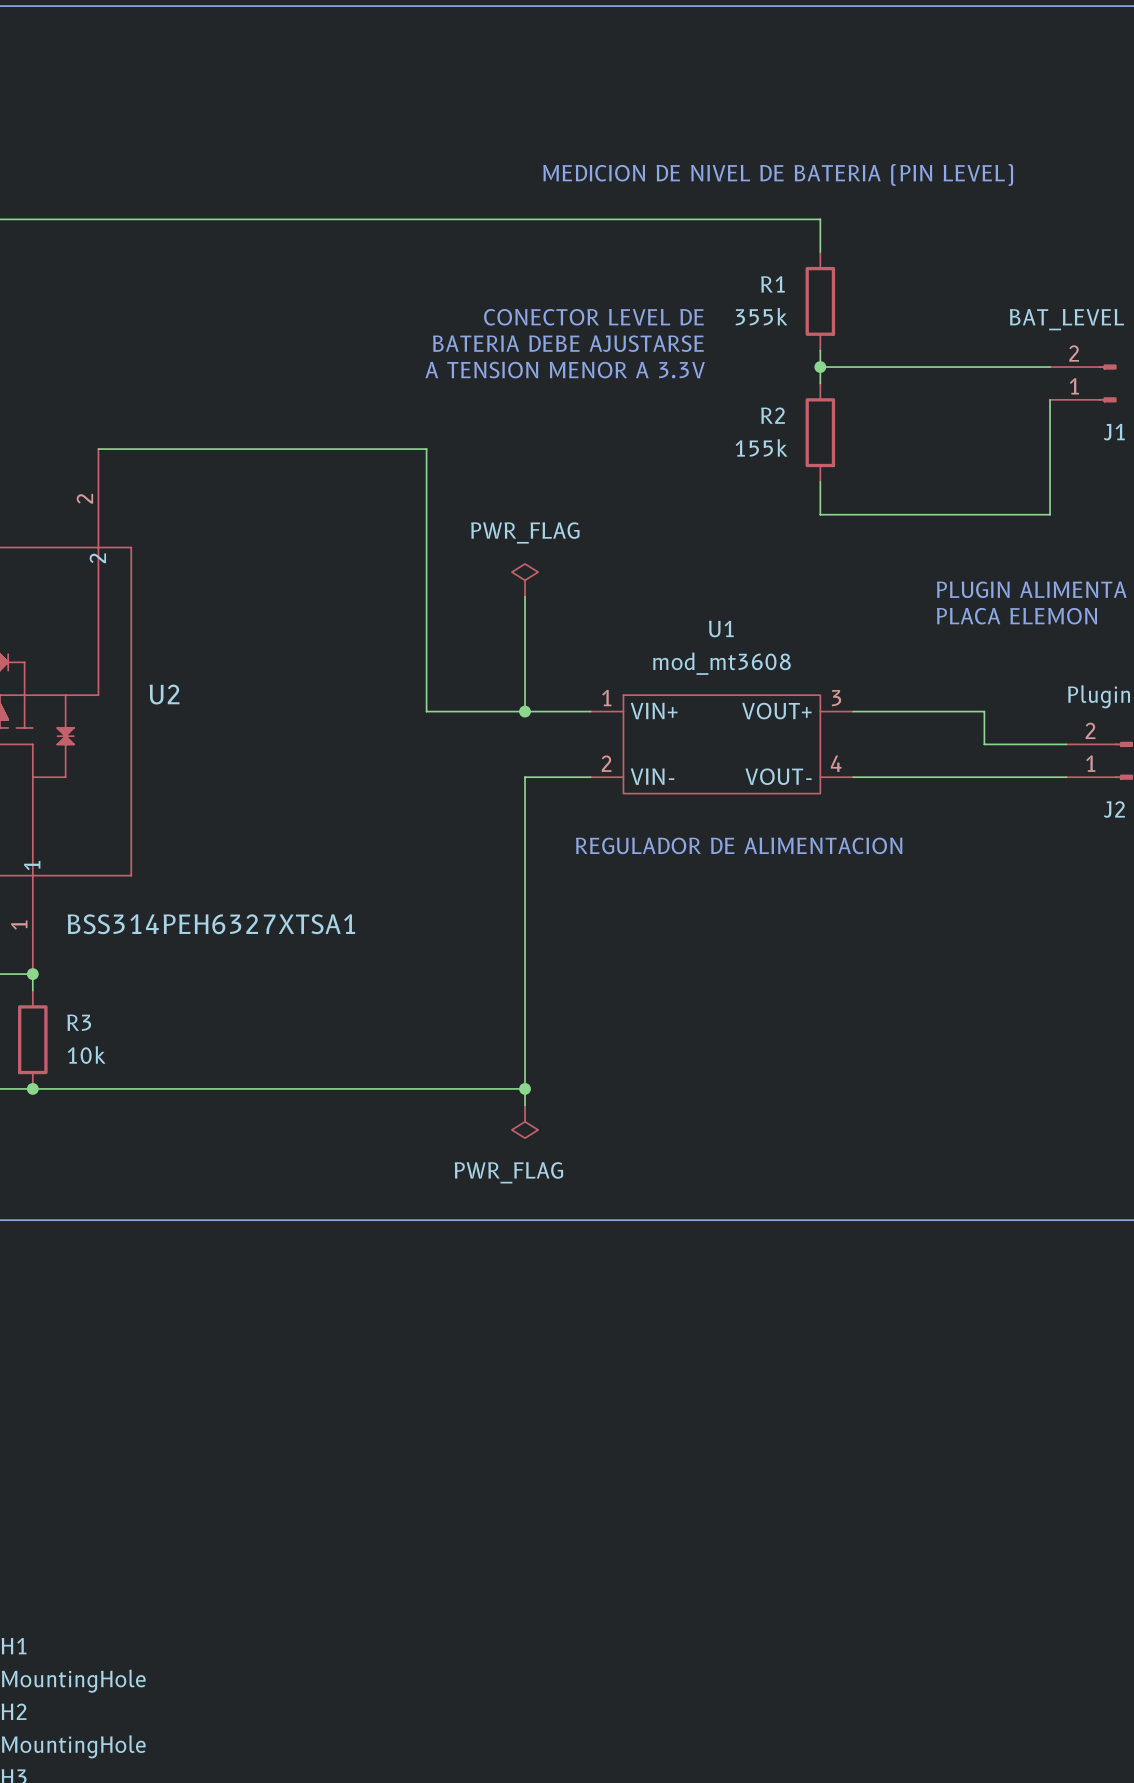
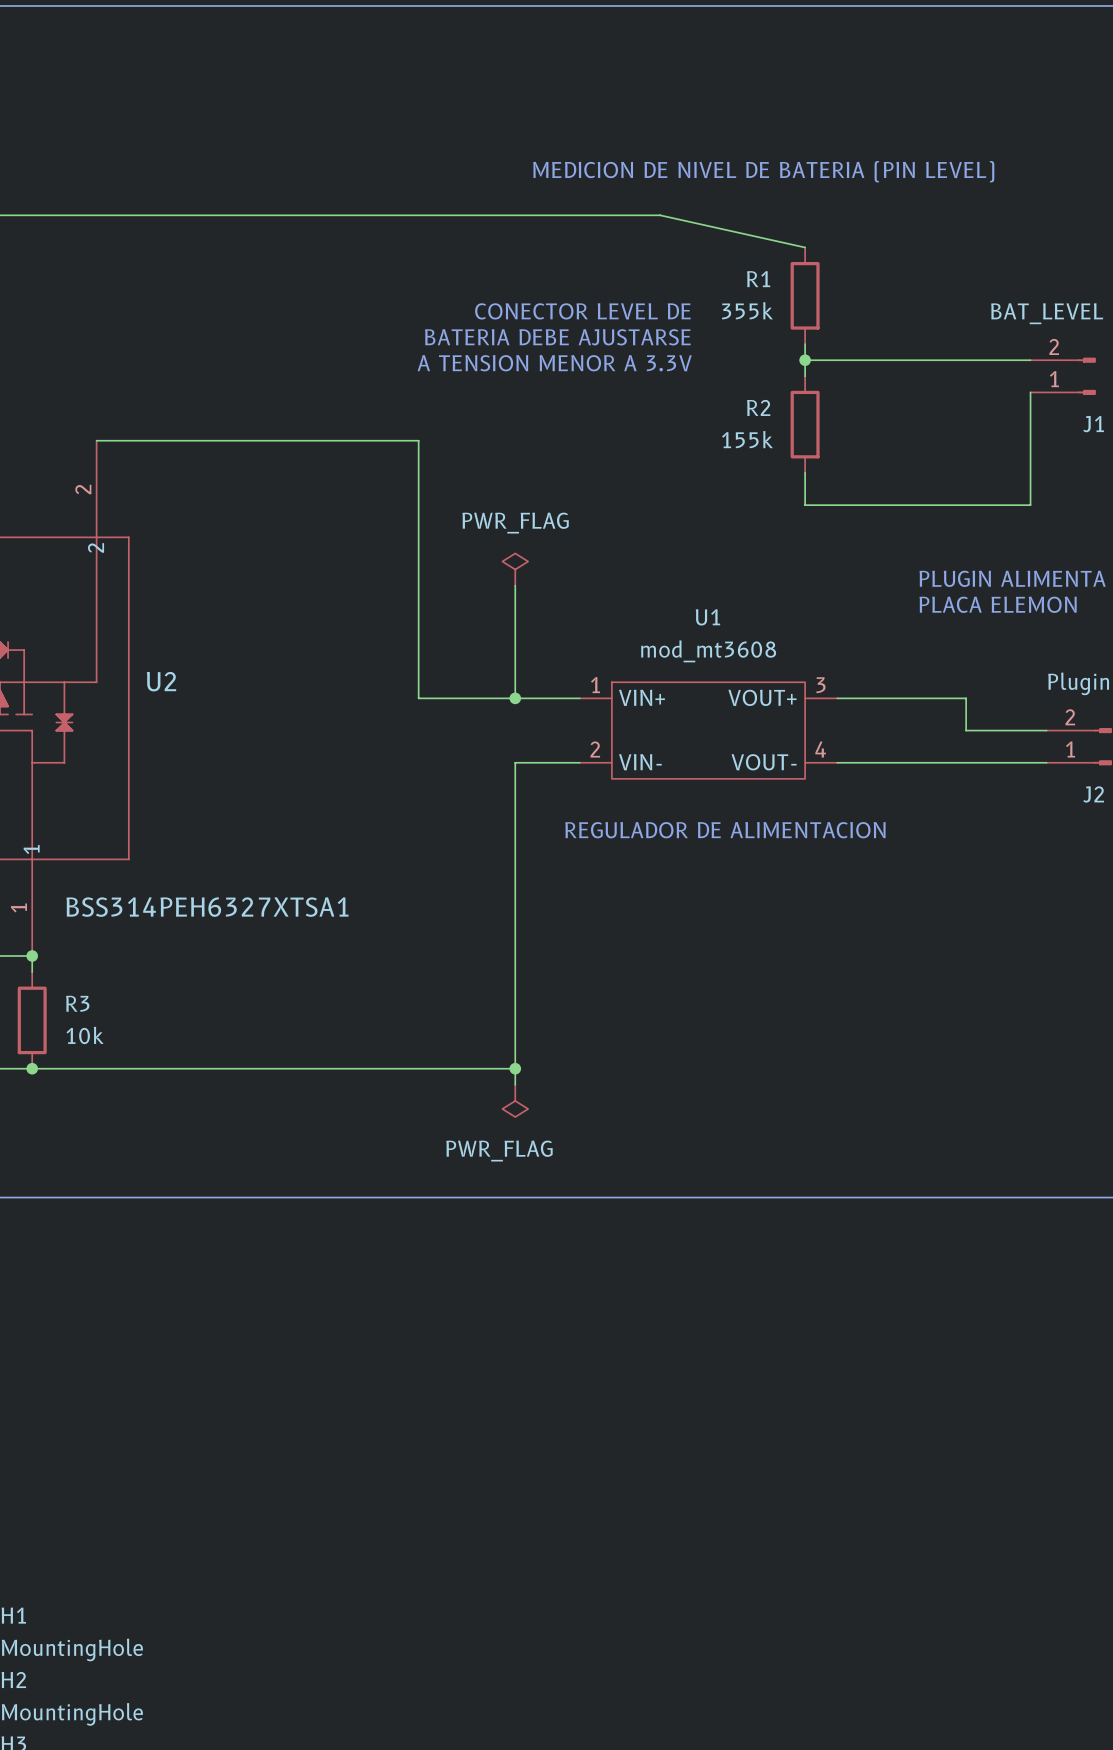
wire: (672, 219) (820, 219) (820, 252) -> (660, 215) (805, 247)

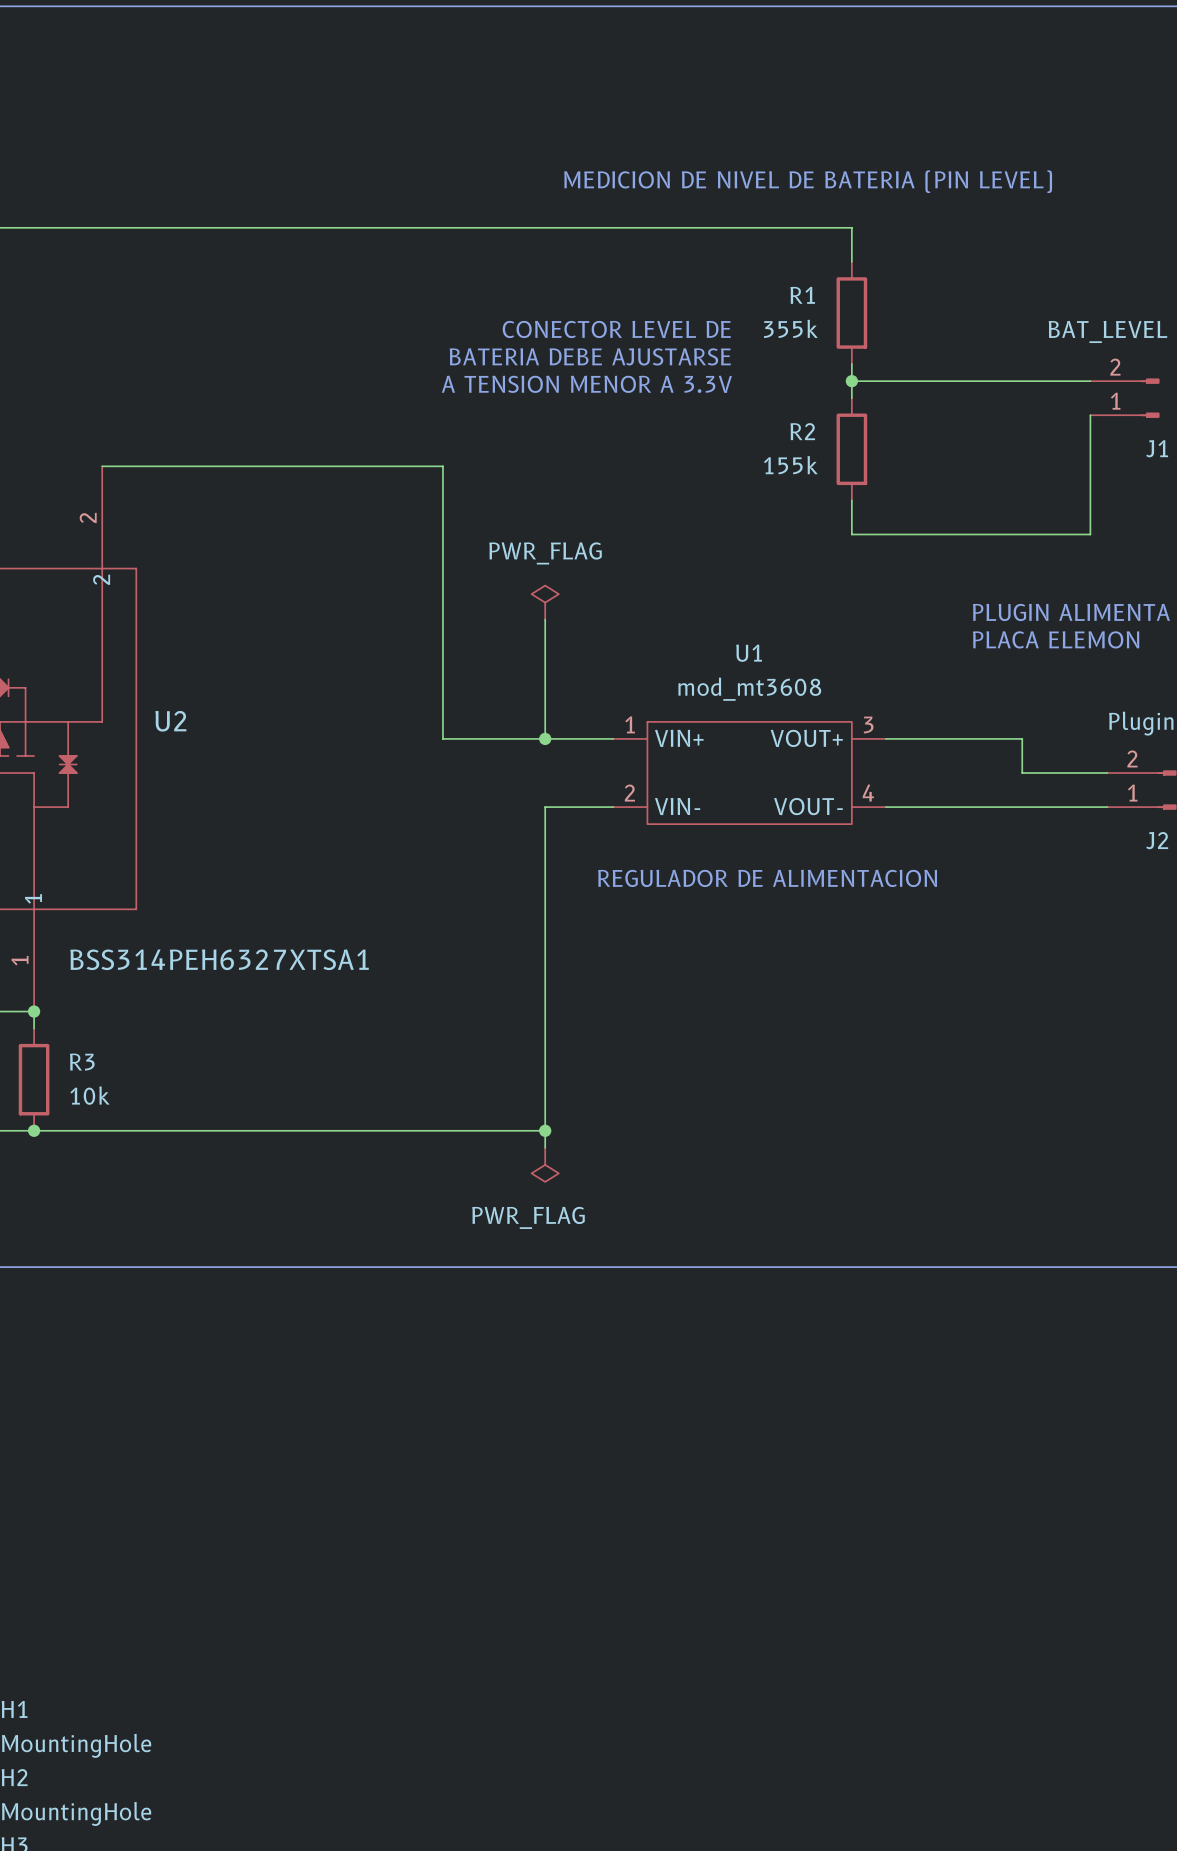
wire: (660, 215) (805, 247) -> (698, 227) (851, 227) (851, 261)

